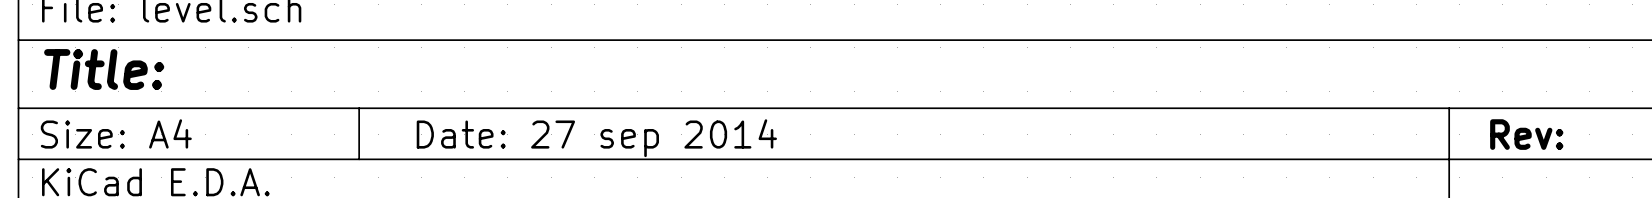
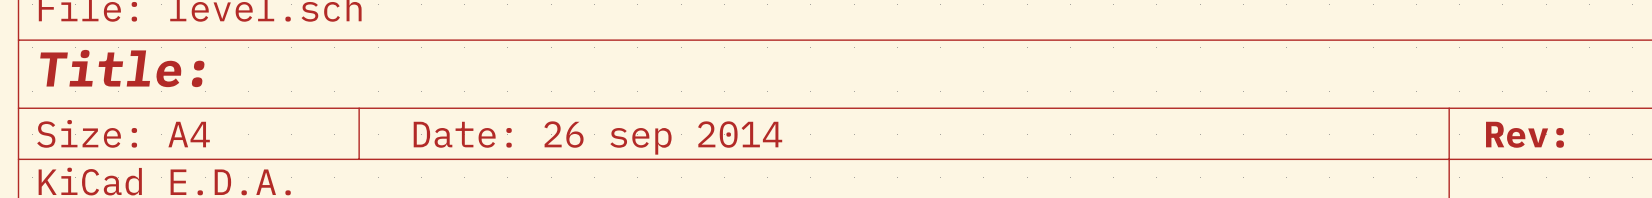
title block: Date: 27 sep 2014 (596, 138) -> Date: 26 sep 2014 (597, 137)

